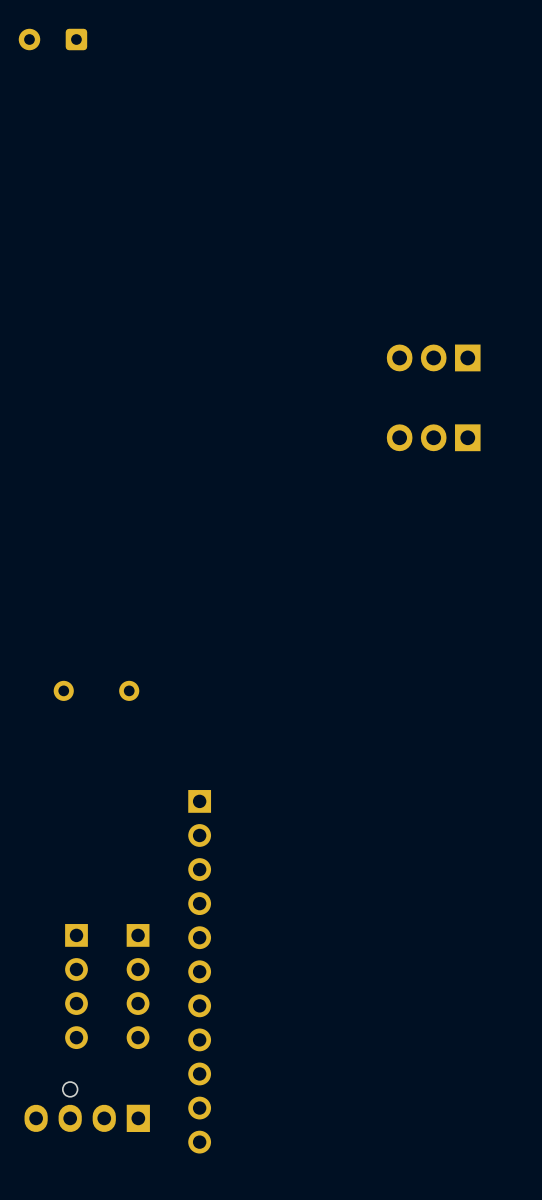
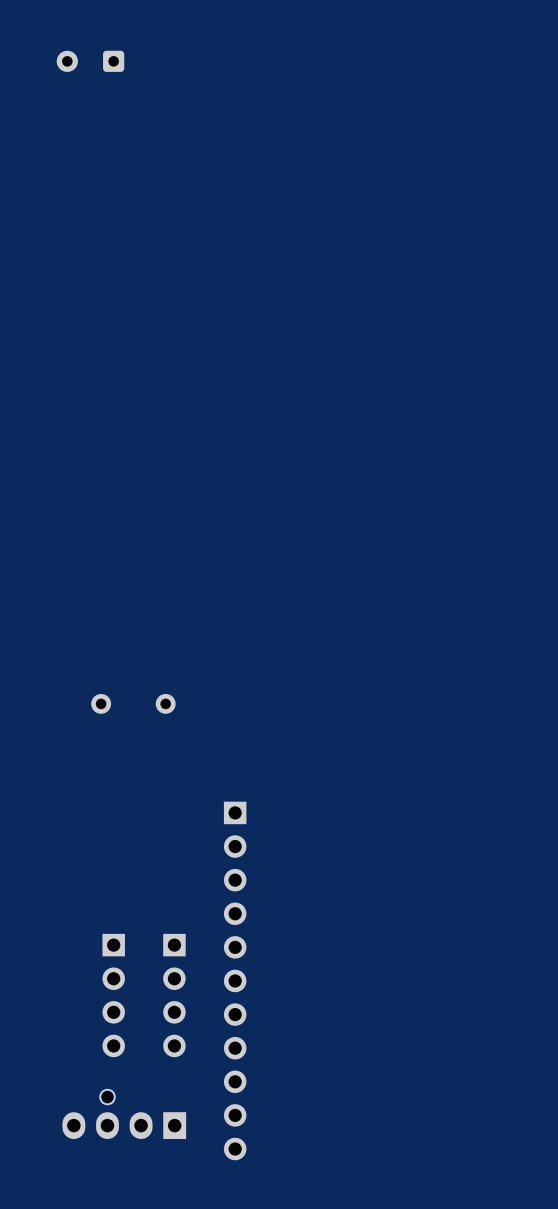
part: (433, 357) -> none
part: (433, 437) -> none

